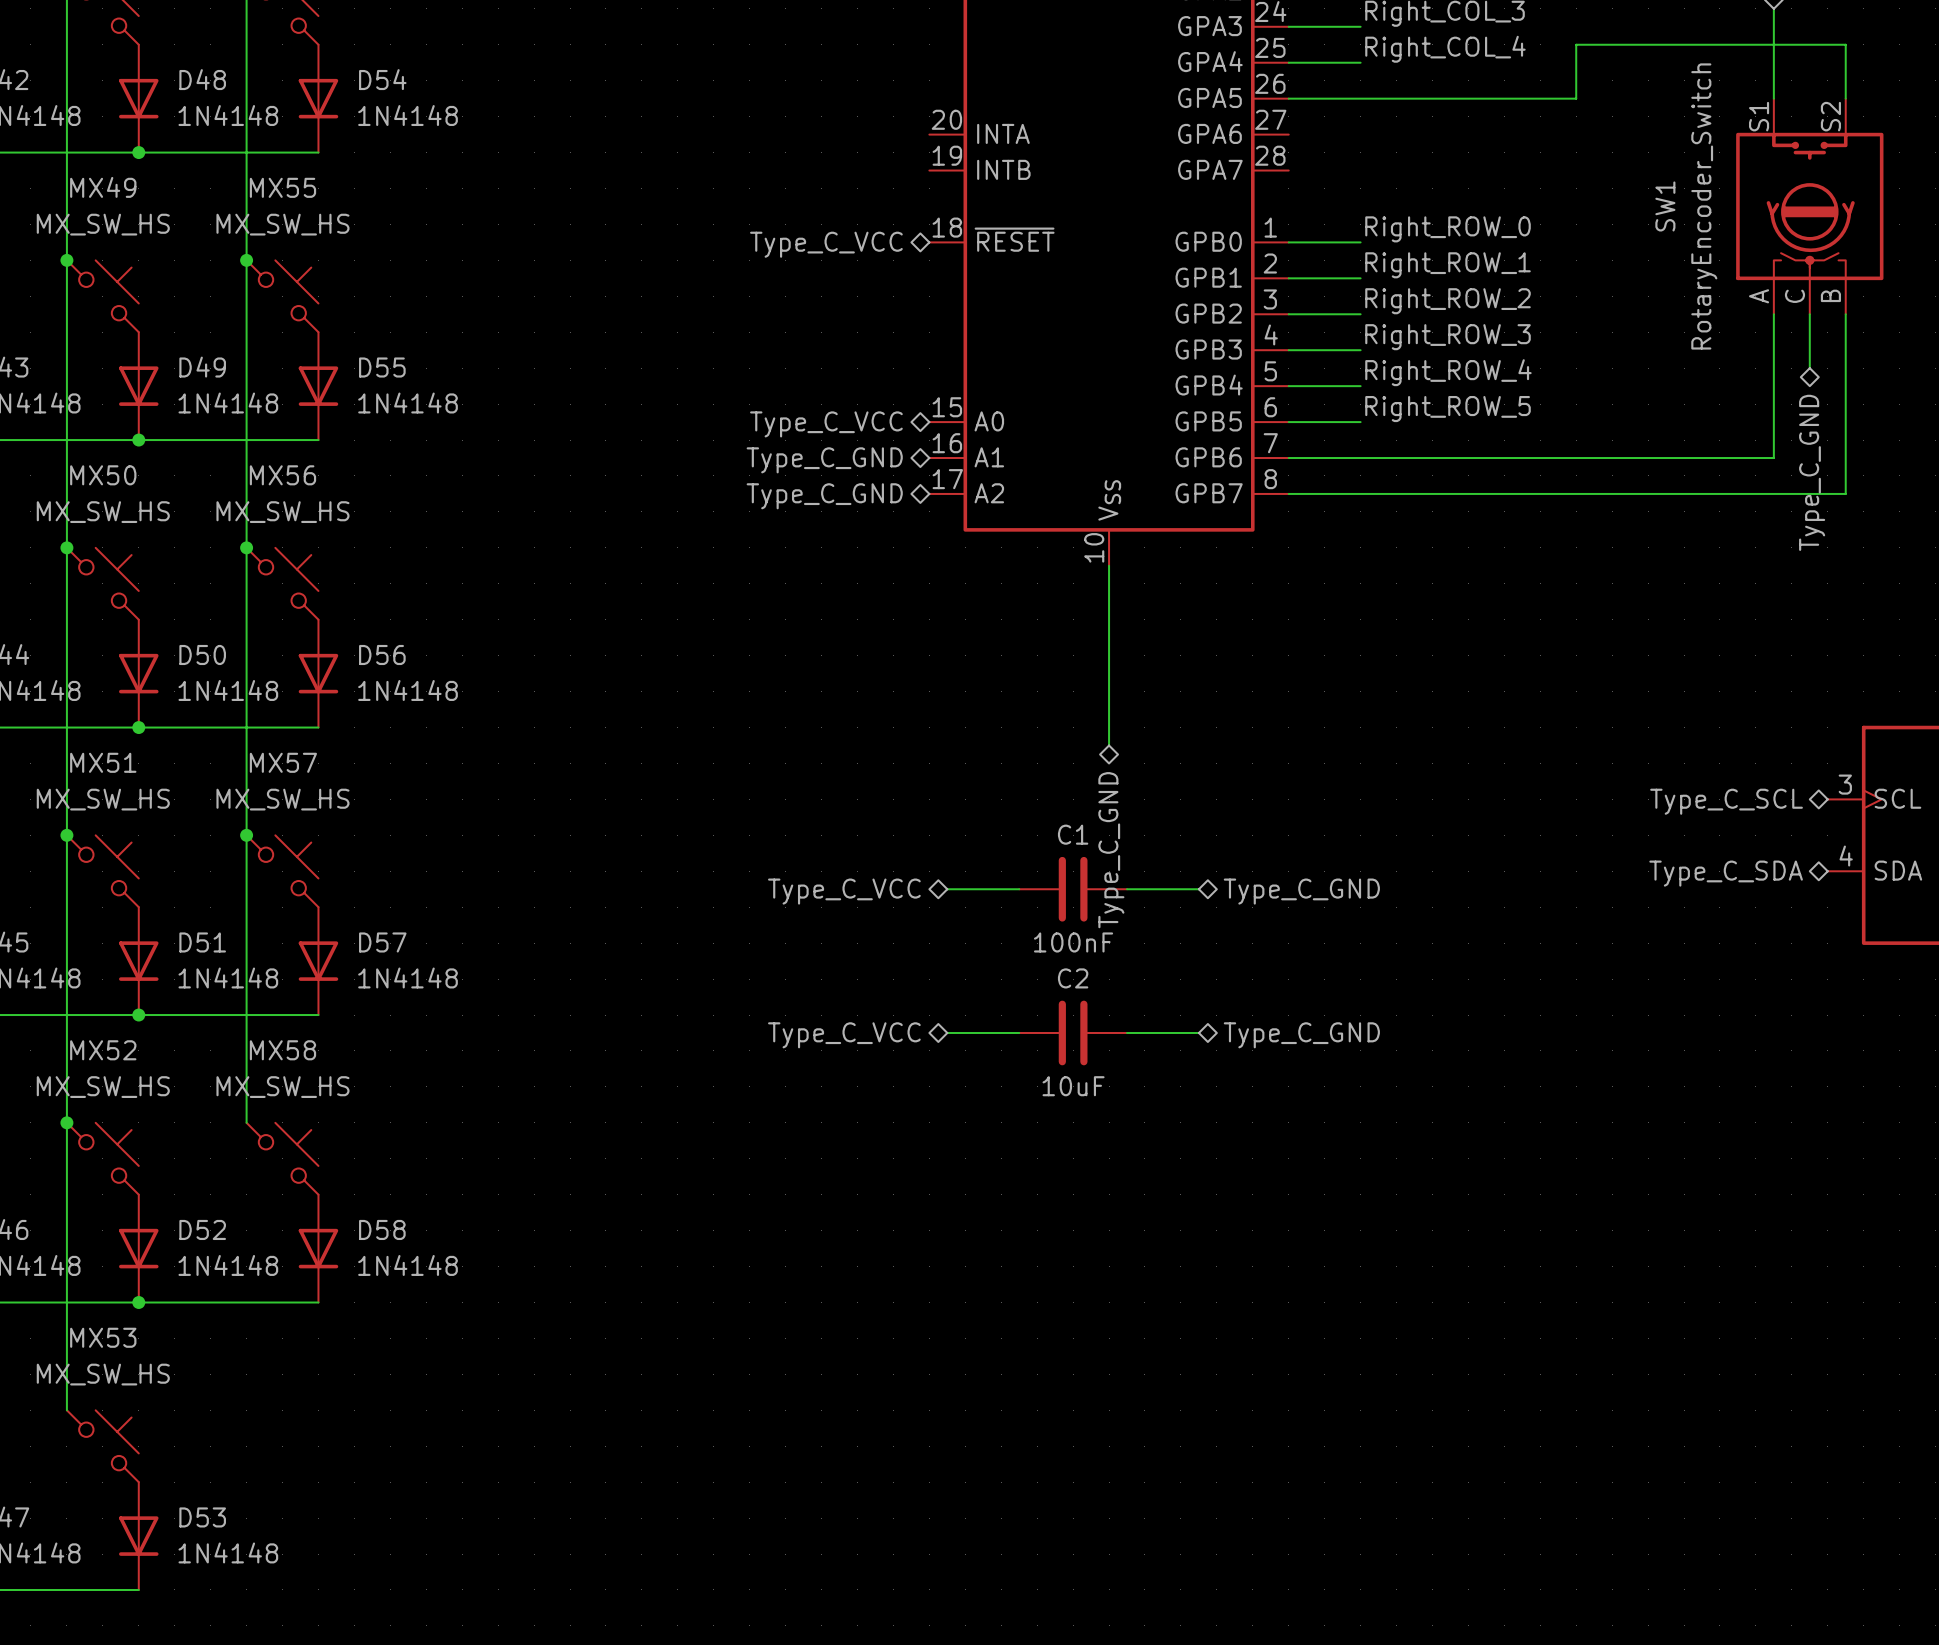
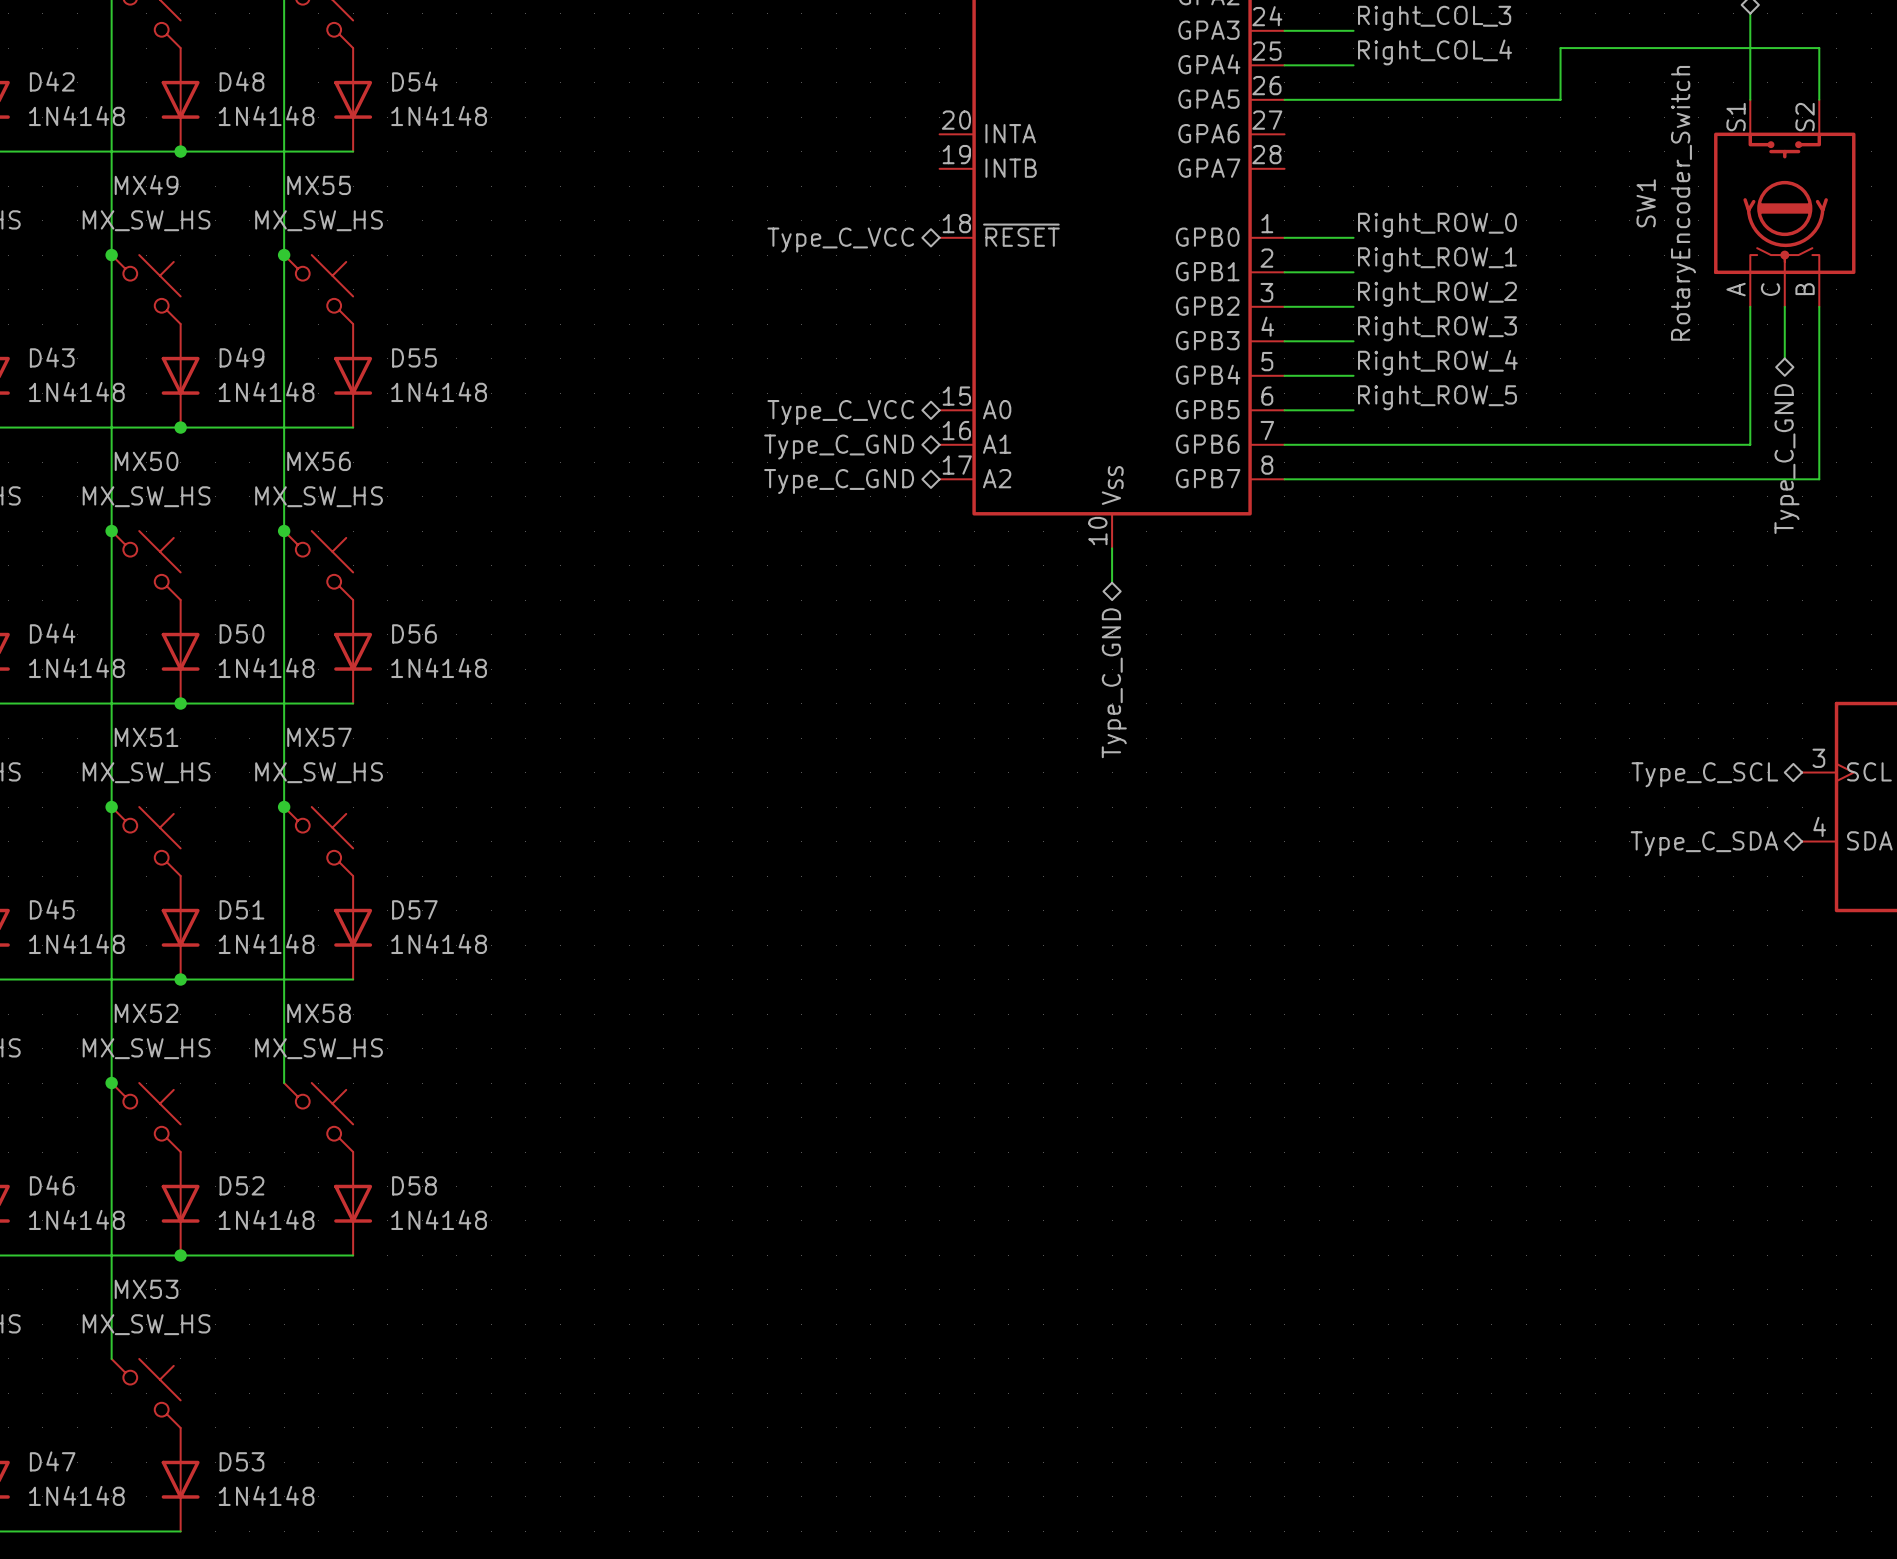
wire: (1109, 601) (1109, 745) -> none
hierarchical label position: Type_C_GND (1111, 850) -> Type_C_GND (1114, 683)
wire: (947, 889) (1019, 889) -> none
C1: 100nF (1073, 889) -> none
wire: (1127, 889) (1198, 889) -> none
hierarchical label: Type_C_VCC (844, 891) -> none
hierarchical label: Type_C_GND (1301, 891) -> none
wire: (947, 1032) (1019, 1032) -> none
C2: 10uF (1073, 1032) -> none
wire: (1127, 1032) (1198, 1032) -> none
hierarchical label: Type_C_VCC (844, 1035) -> none
hierarchical label: Type_C_GND (1301, 1035) -> none

